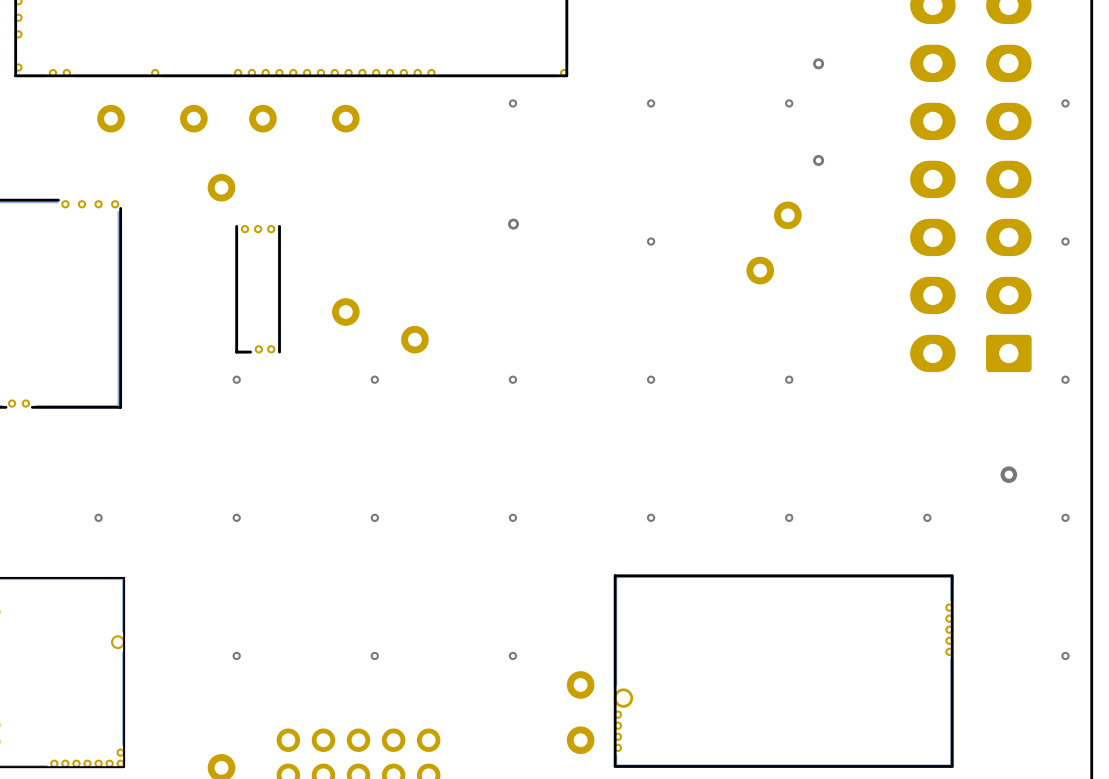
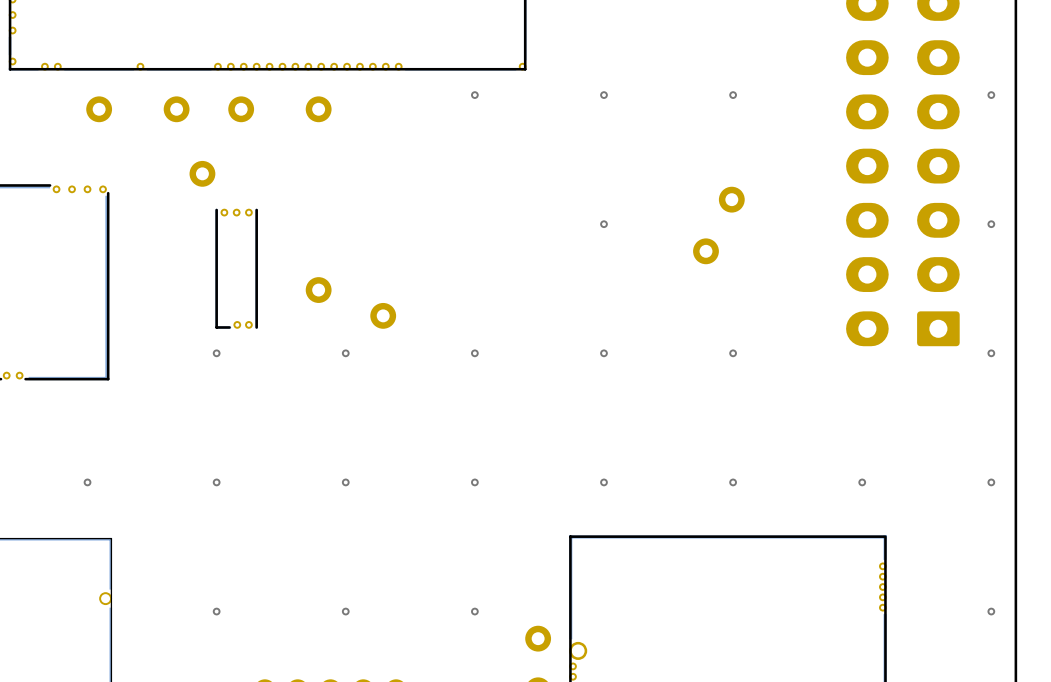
via: (818, 63) -> none
via: (818, 160) -> none
via: (513, 224) -> none
via: (1008, 474) -> none

